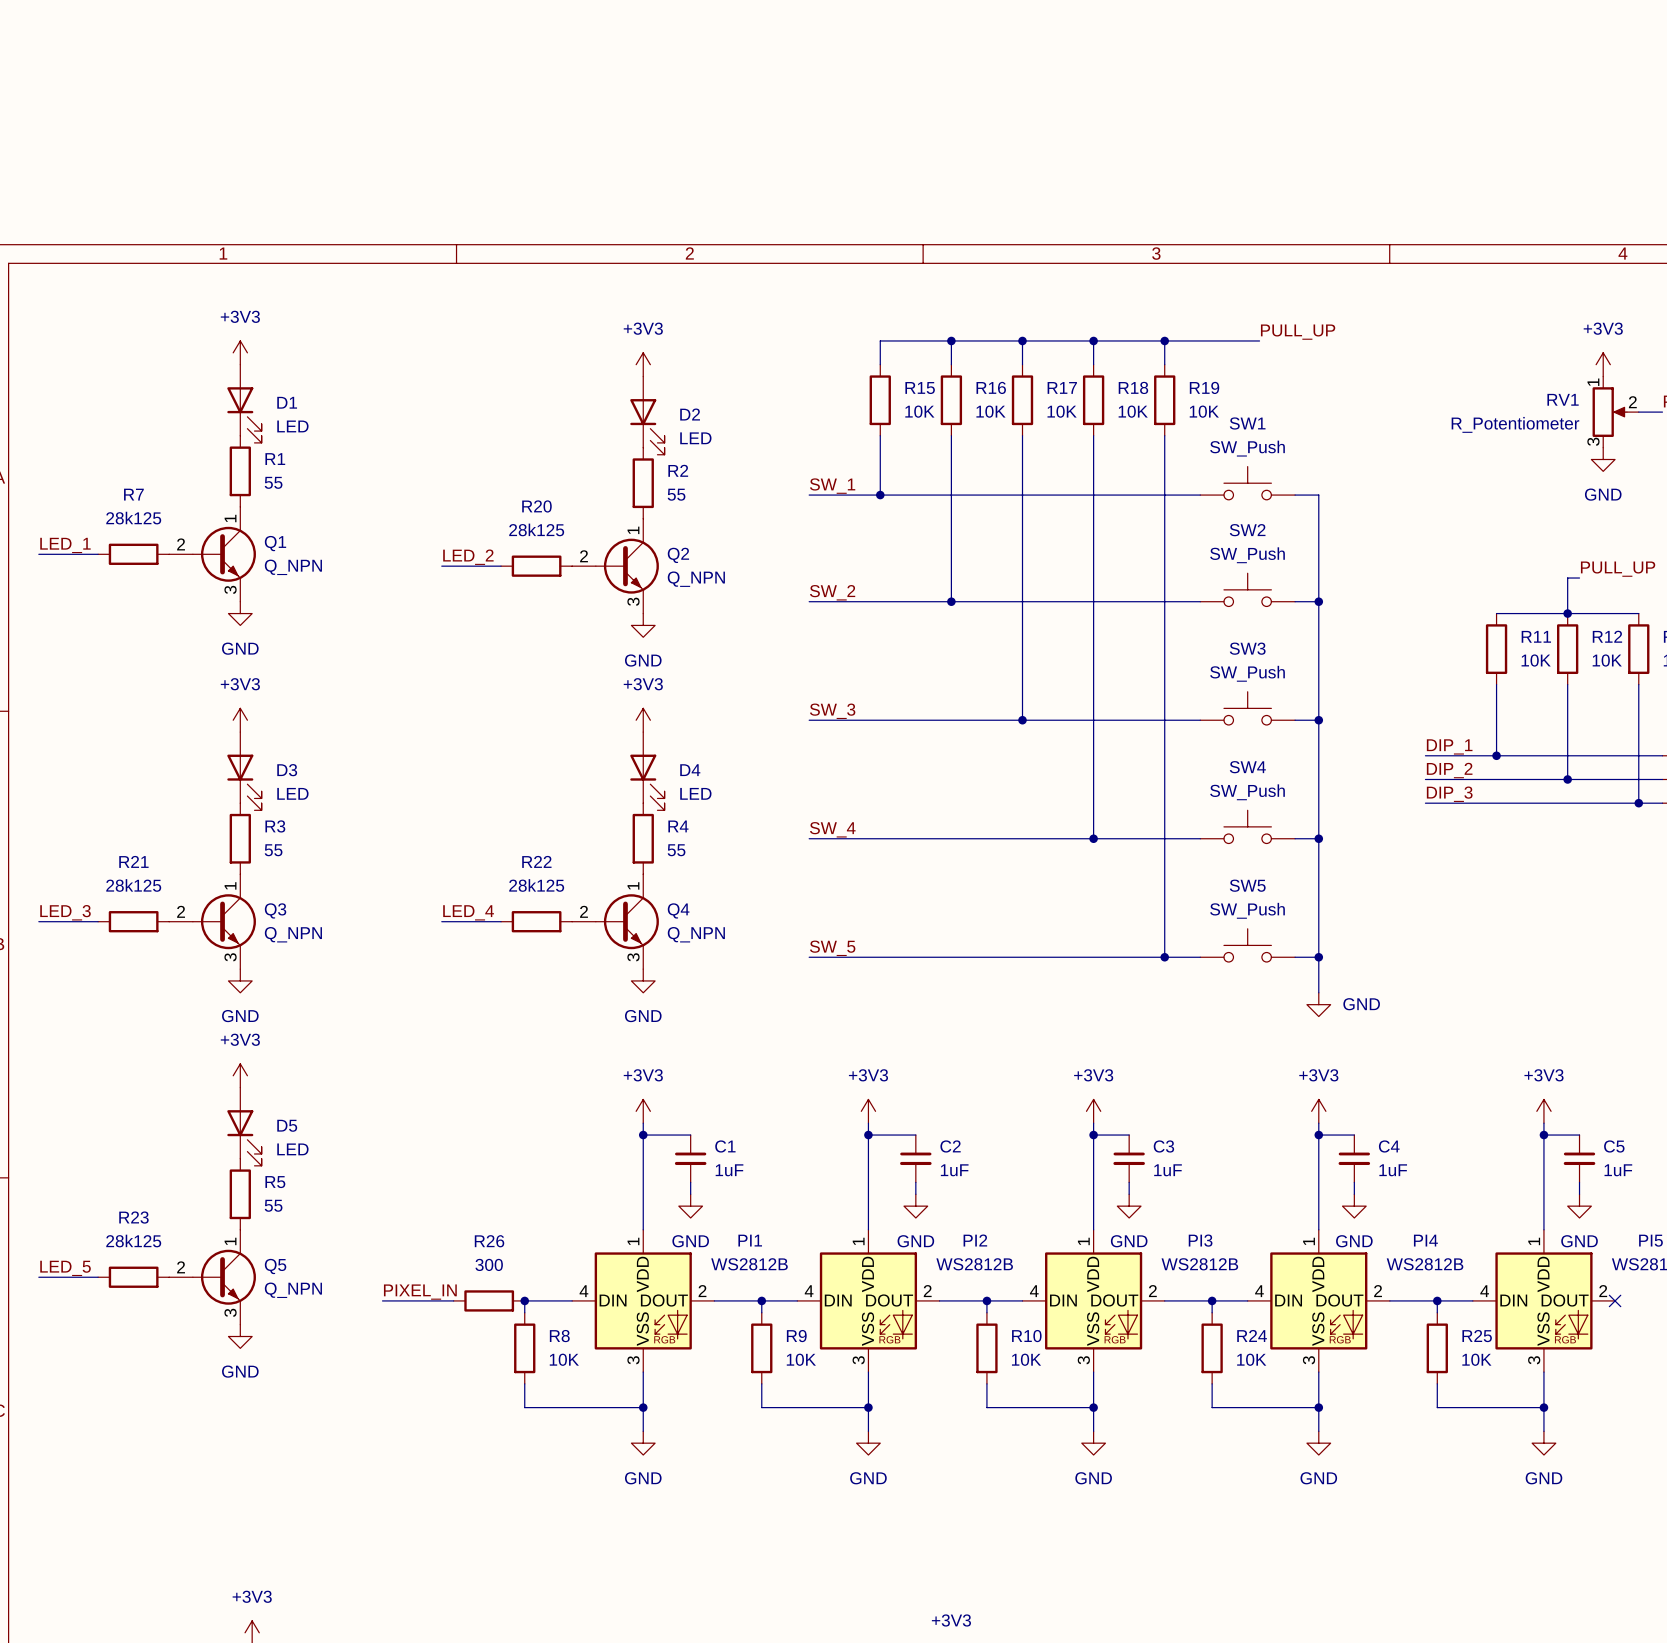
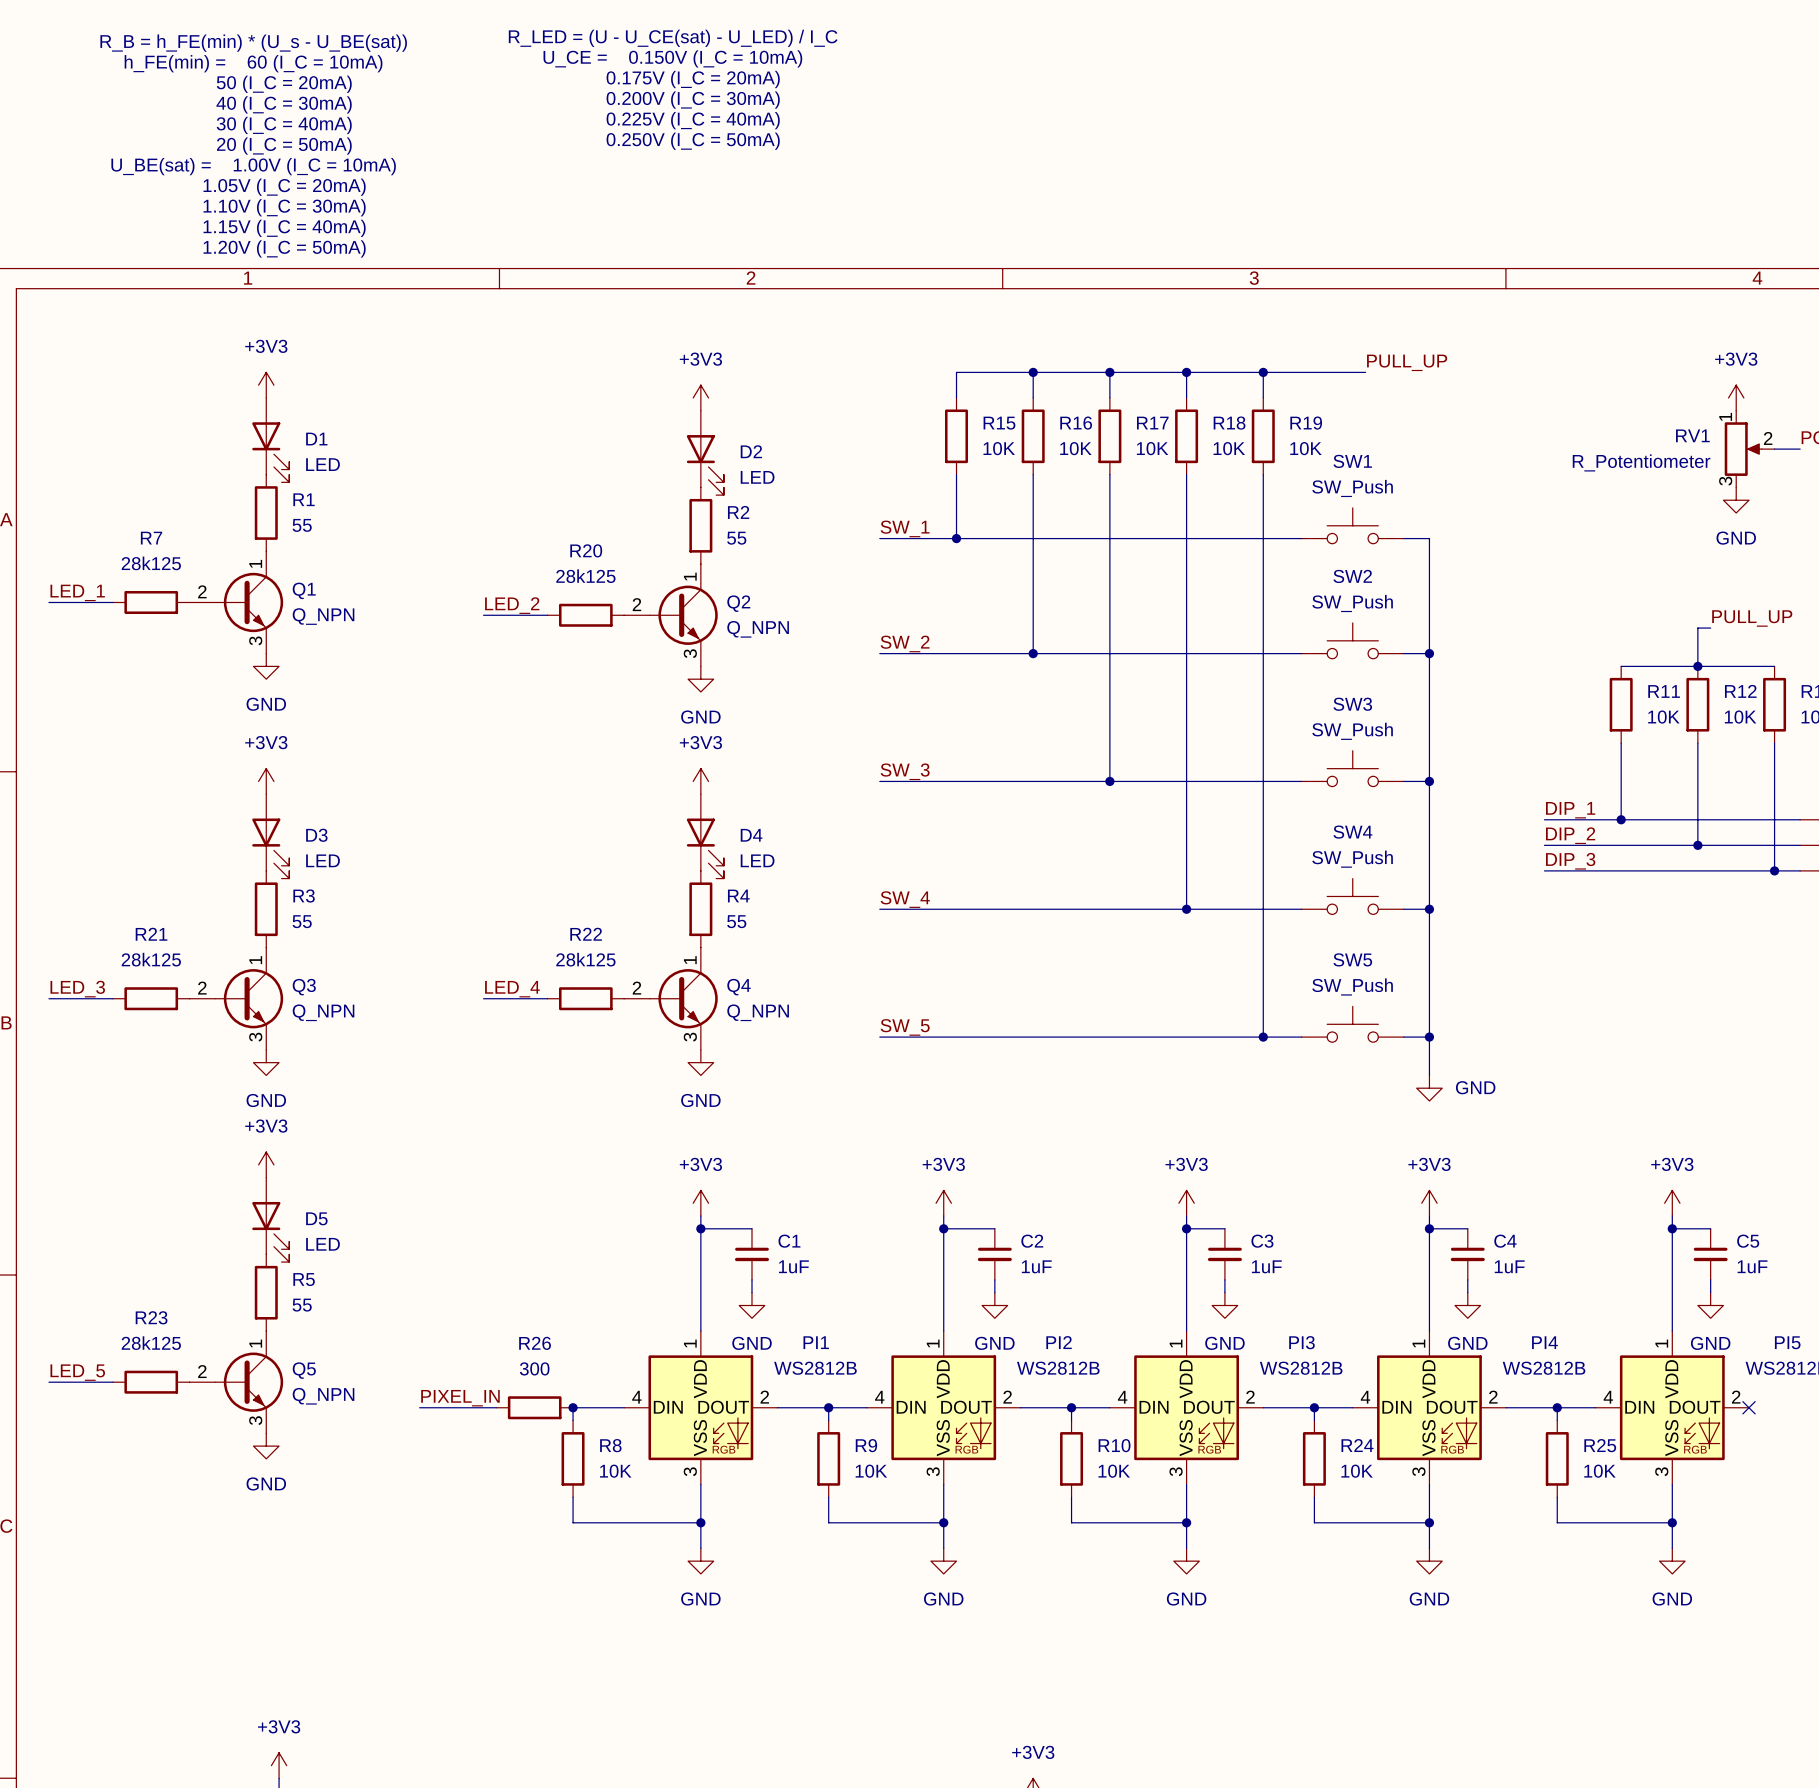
text: none -> R_LED = (U - U_CE(sat) - U_LED) / I_C (673, 38)
text: none -> R_B = h_FE(min) * (U_s - U_BE(sat)) (253, 43)
text: none -> U_CE = 0.150V (I_C = 10mA) (672, 58)
text: none -> h_FE(min) = 60 (I_C = 10mA) (253, 63)
text: none -> 0.175V (I_C = 20mA) (693, 79)
text: none -> 50 (I_C = 20mA) (284, 84)
text: none -> 0.200V (I_C = 30mA) (693, 100)
text: none -> 40 (I_C = 30mA) (284, 104)
text: none -> 0.225V (I_C = 40mA) (693, 120)
text: none -> 30 (I_C = 40mA) (284, 125)
text: none -> 0.250V (I_C = 50mA) (693, 141)
text: none -> 20 (I_C = 50mA) (284, 146)
text: none -> U_BE(sat) = 1.00V (I_C = 10mA) (253, 166)
text: none -> 1.05V (I_C = 20mA) (284, 187)
text: none -> 1.10V (I_C = 30mA) (284, 207)
text: none -> 1.15V (I_C = 40mA) (284, 228)
text: none -> 1.20V (I_C = 50mA) (284, 248)

